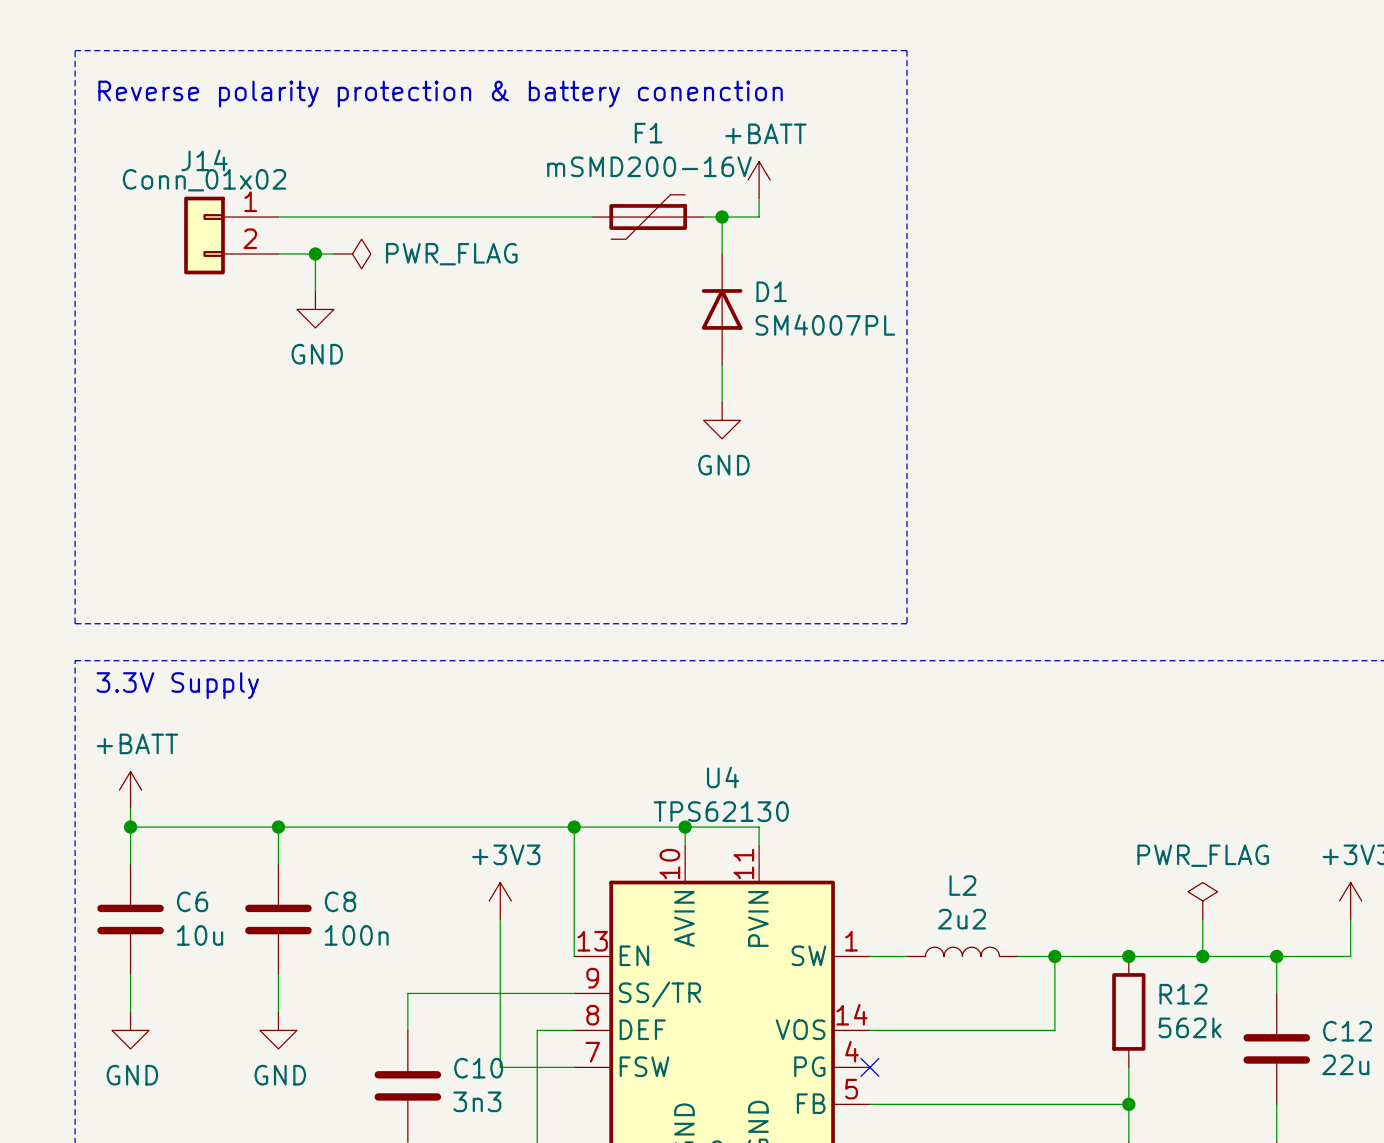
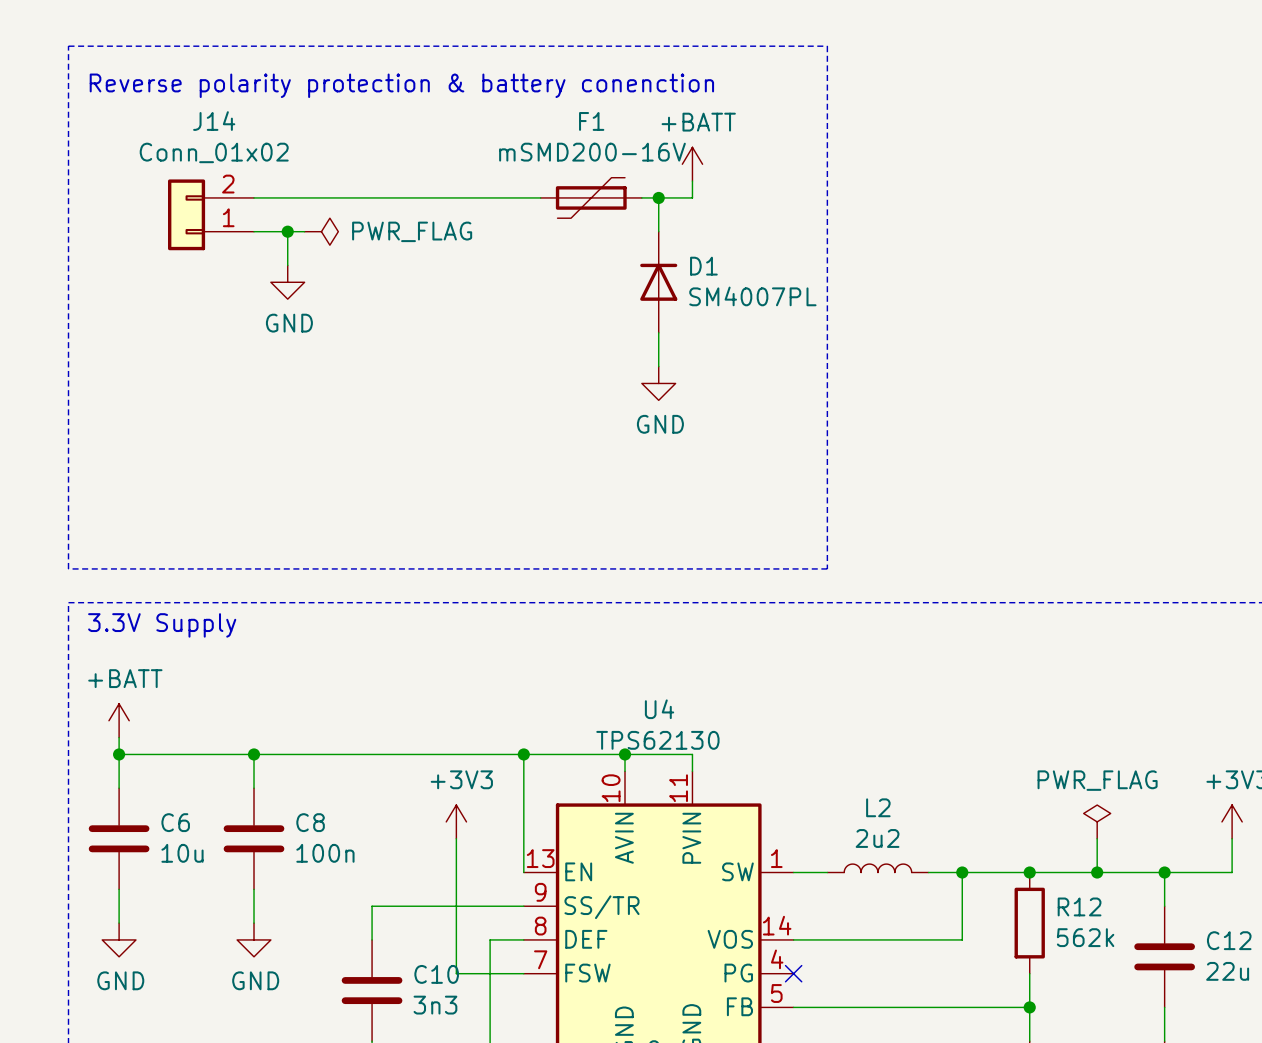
J14 name position: J14 (204, 160) -> J14 (214, 121)
J14 value position: Conn_01x02 (204, 180) -> Conn_01x02 (214, 152)
J14 flip: as is (204, 235) -> up-down (186, 214)

